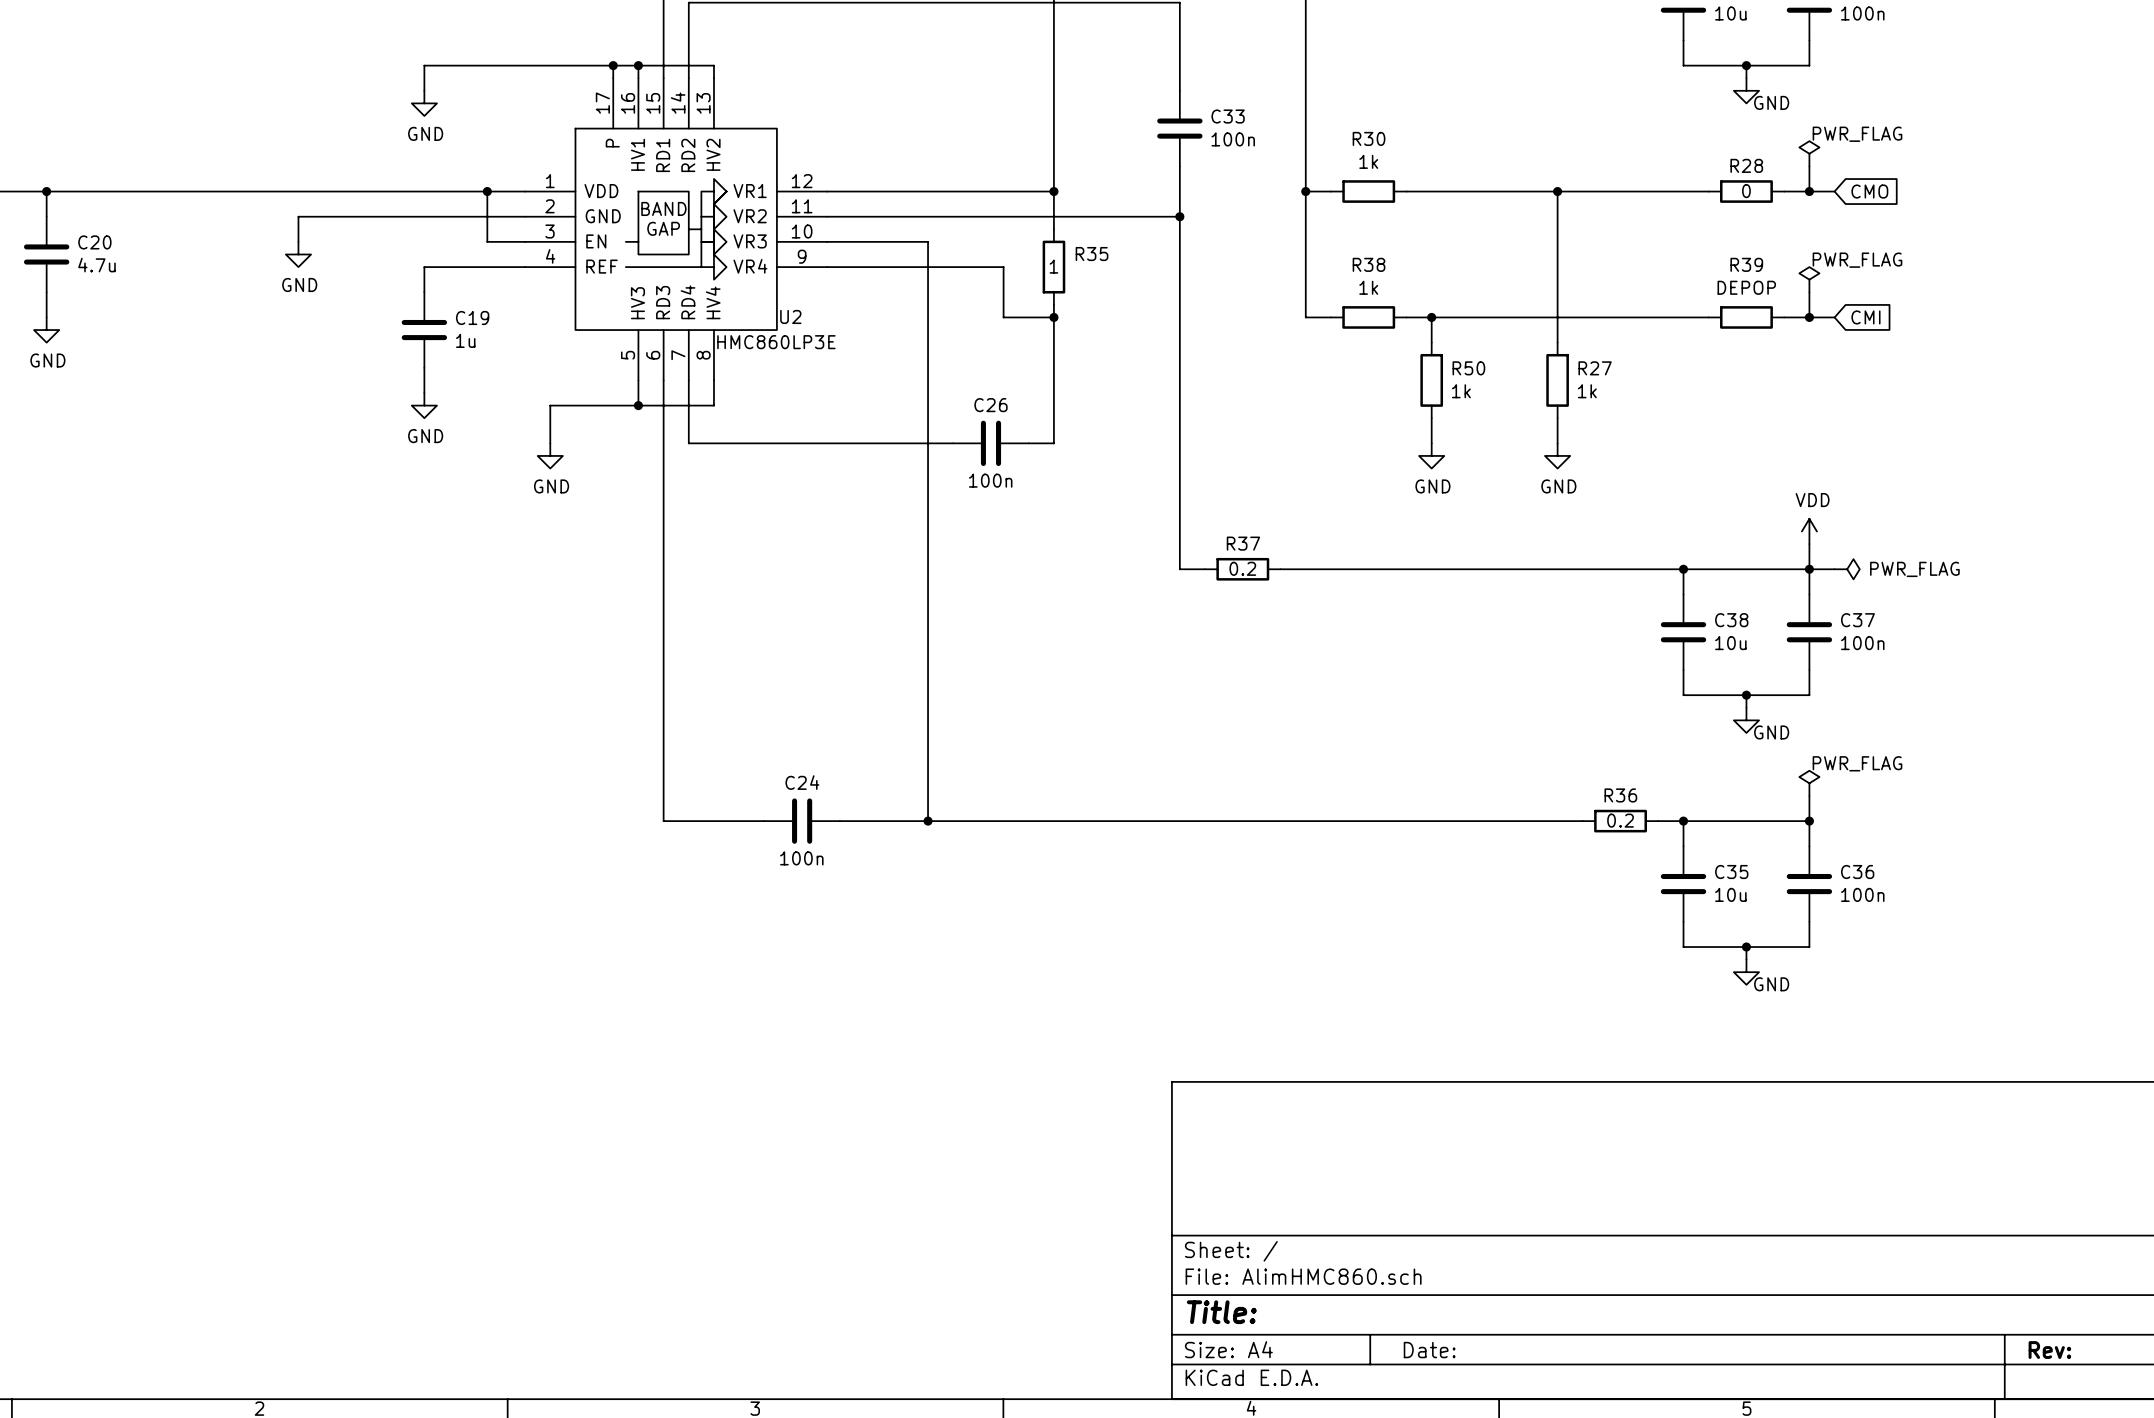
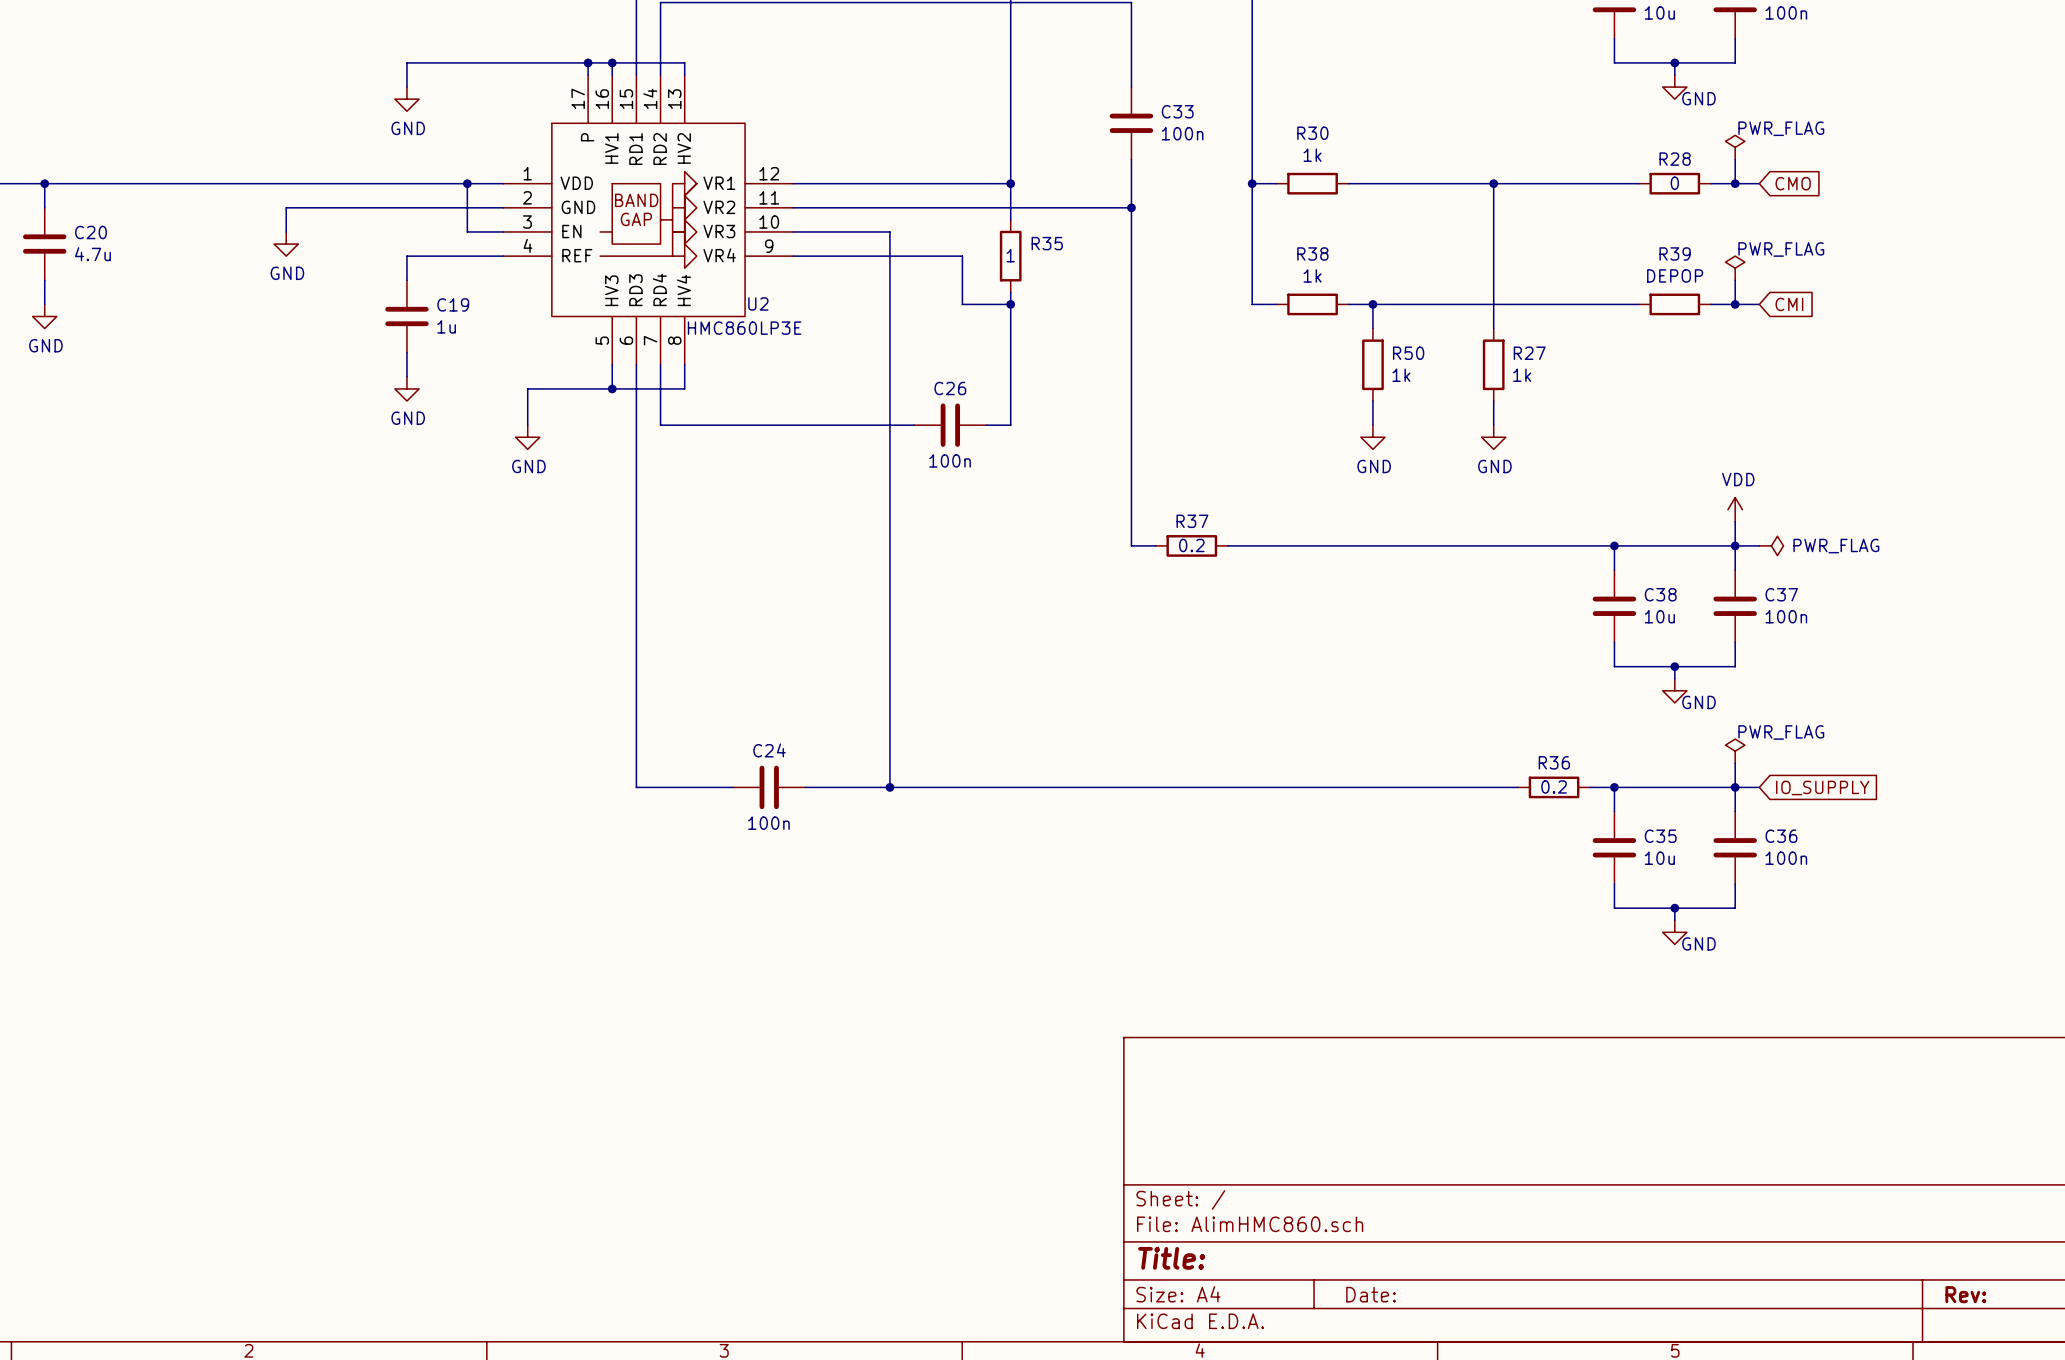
wire: none -> (1735, 787) (1759, 787)
global label: none -> IO_SUPPLY (1822, 787)

